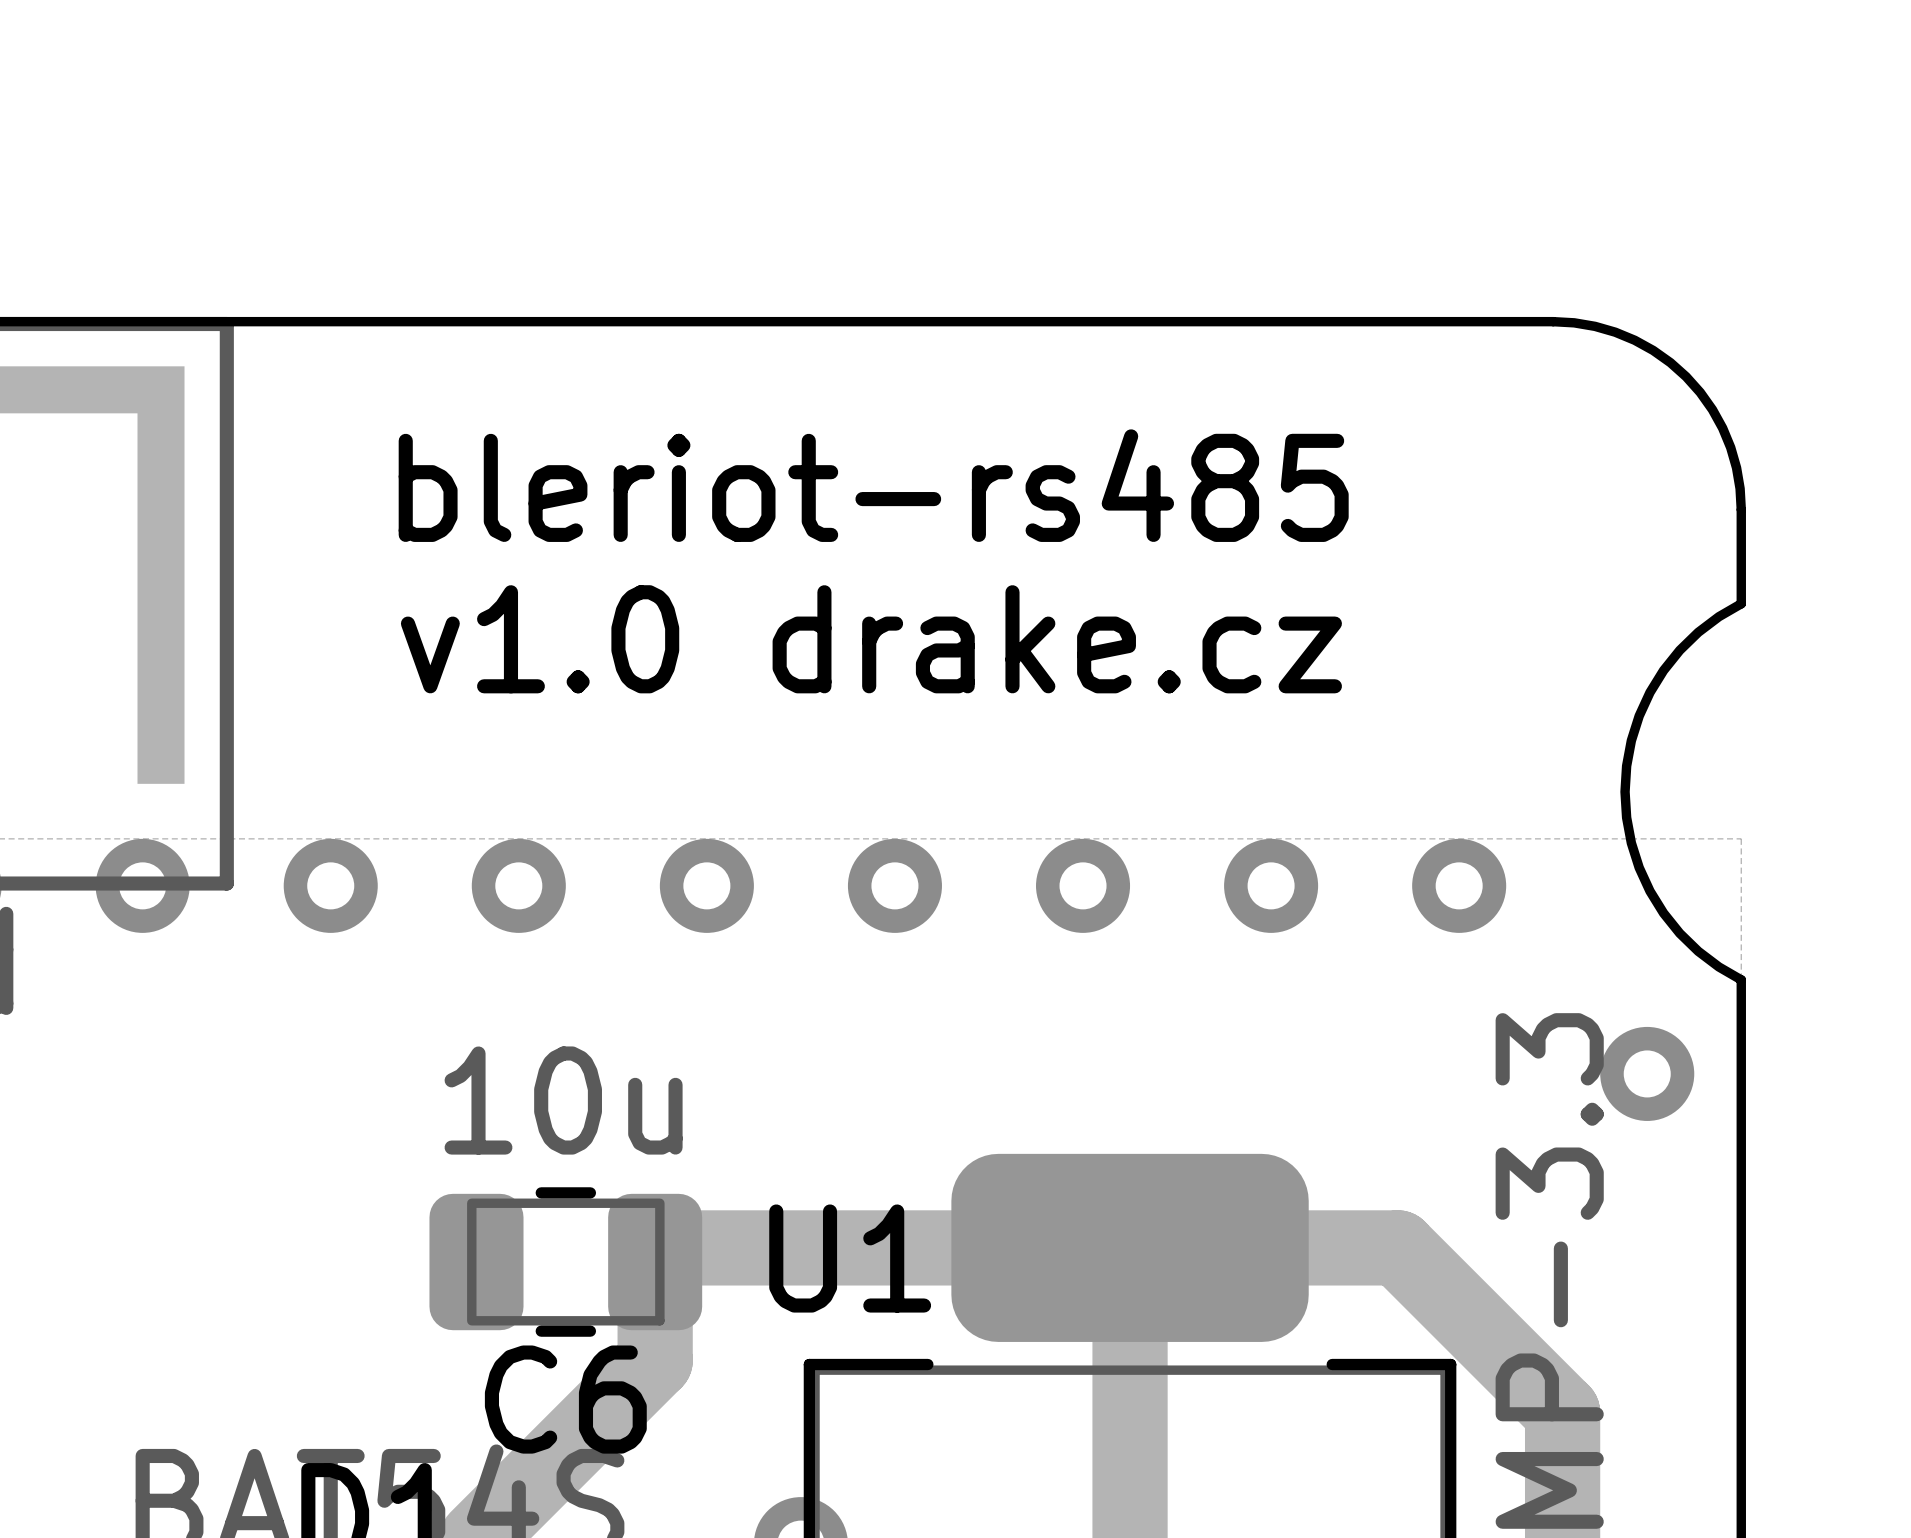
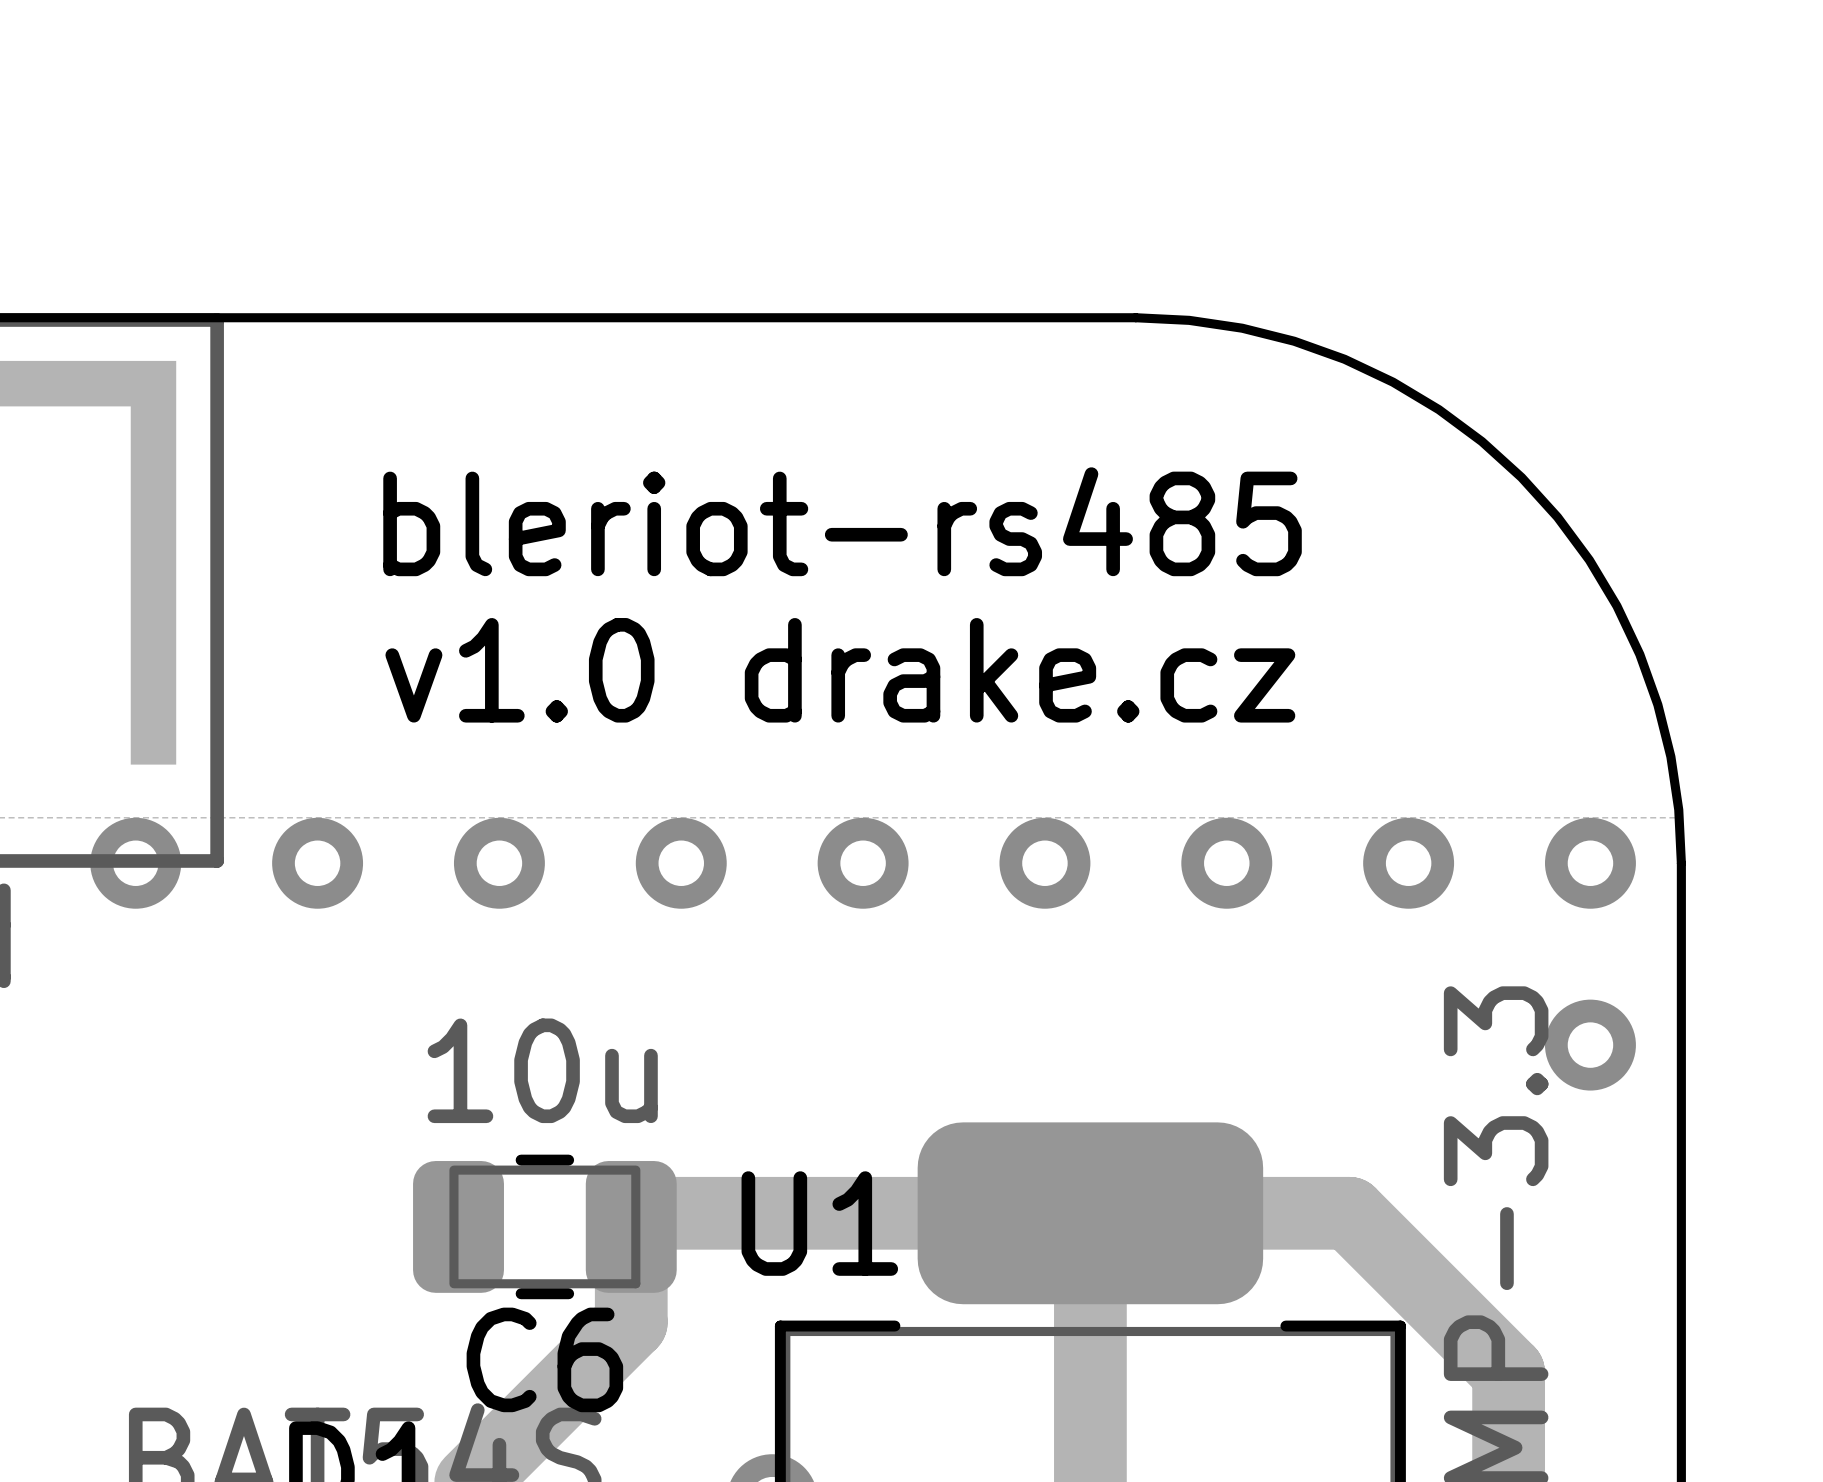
board edge: (1177, 321) (1574, 322) (1615, 332) (1634, 340) (1670, 362) (1700, 392) (1722, 428) (1736, 467) (1741, 509) (1741, 603) (1718, 616) (1698, 632) (1679, 650) (1663, 670) (1649, 692) (1639, 715) (1631, 740) (1626, 766) (1625, 791) (1626, 817) (1631, 843) (1639, 867) (1649, 891) (1663, 913) (1679, 933) (1698, 951) (1718, 966) (1741, 979) -> (1135, 317) (1189, 320) (1242, 328) (1294, 341) (1344, 359) (1393, 382) (1438, 409) (1481, 441) (1521, 477) (1557, 517) (1589, 560) (1616, 606) (1639, 654) (1657, 704) (1670, 756) (1678, 809) (1681, 863) (1681, 954)
text position: bleriot-rs485 (873, 485) -> bleriot-rs485 (842, 521)
text position: v1.0 drake.cz (871, 639) -> v1.0 drake.cz (840, 670)
via: none -> (1590, 863)

